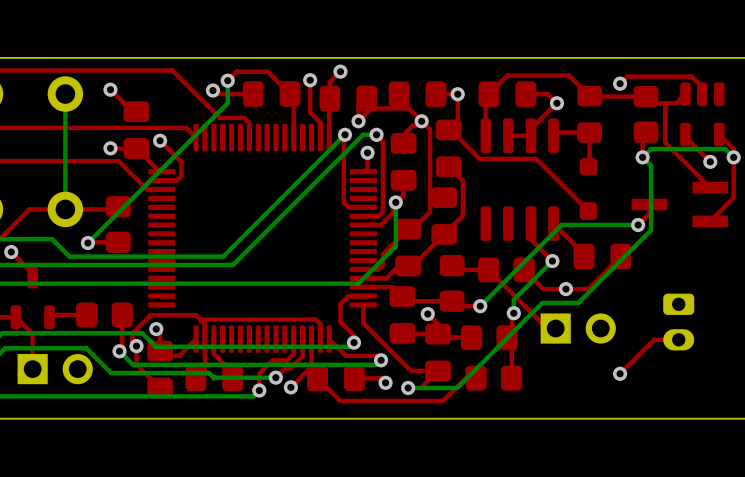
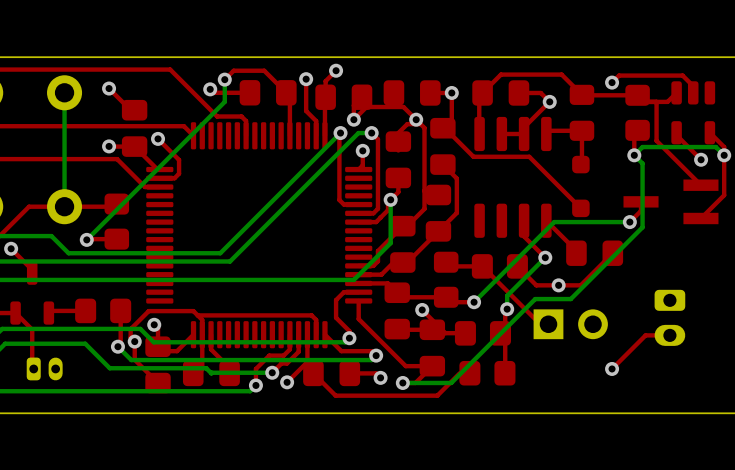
part footprint: [17, 354, 93, 385] -> [26, 357, 63, 381]

